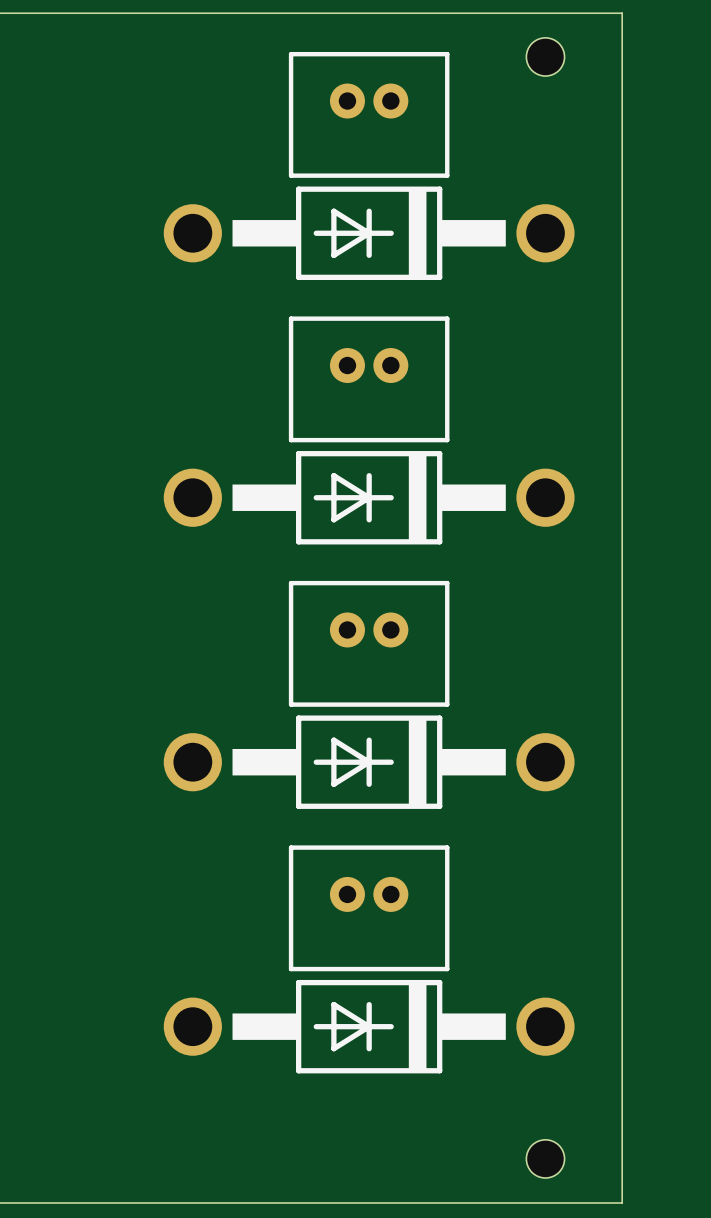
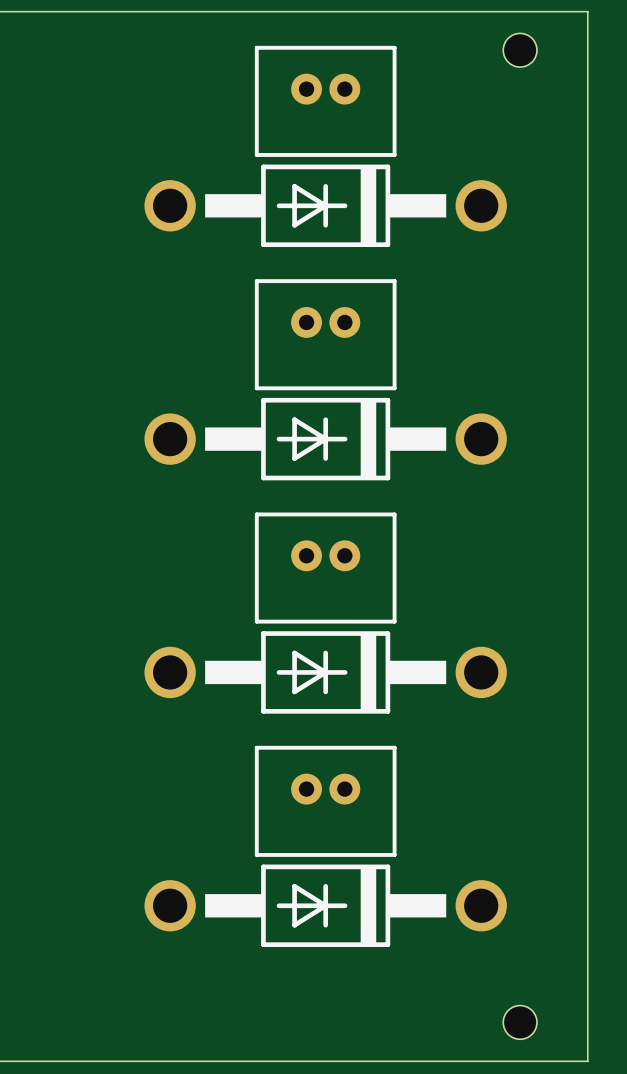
board edge: (622, 13) (622, 1202) -> (548, 11) (587, 11) (587, 1061) (548, 1061)
hole position: (545, 56) -> (520, 50)
hole position: (545, 1158) -> (520, 1022)

